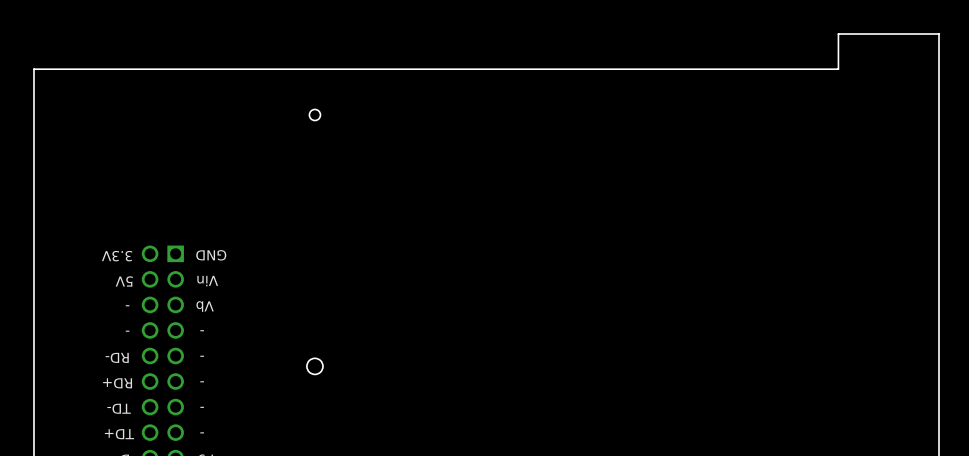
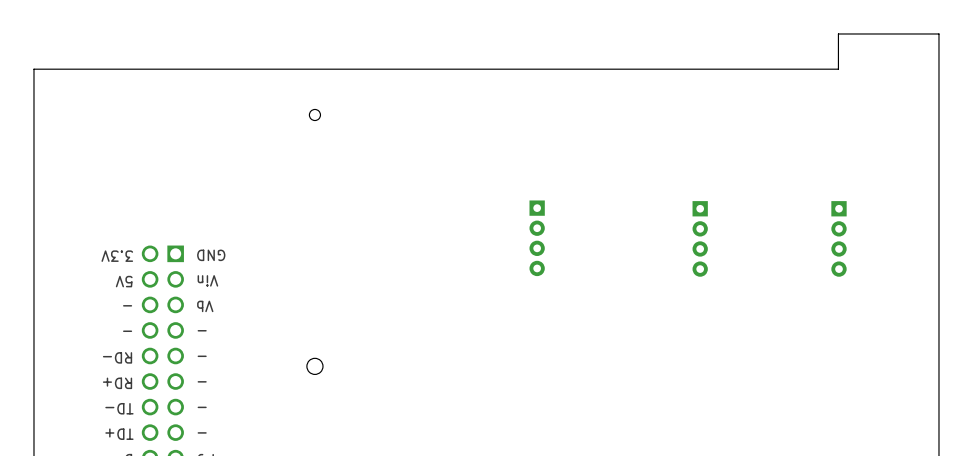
part: none -> (537, 238)
part: none -> (700, 238)
part: none -> (839, 238)

